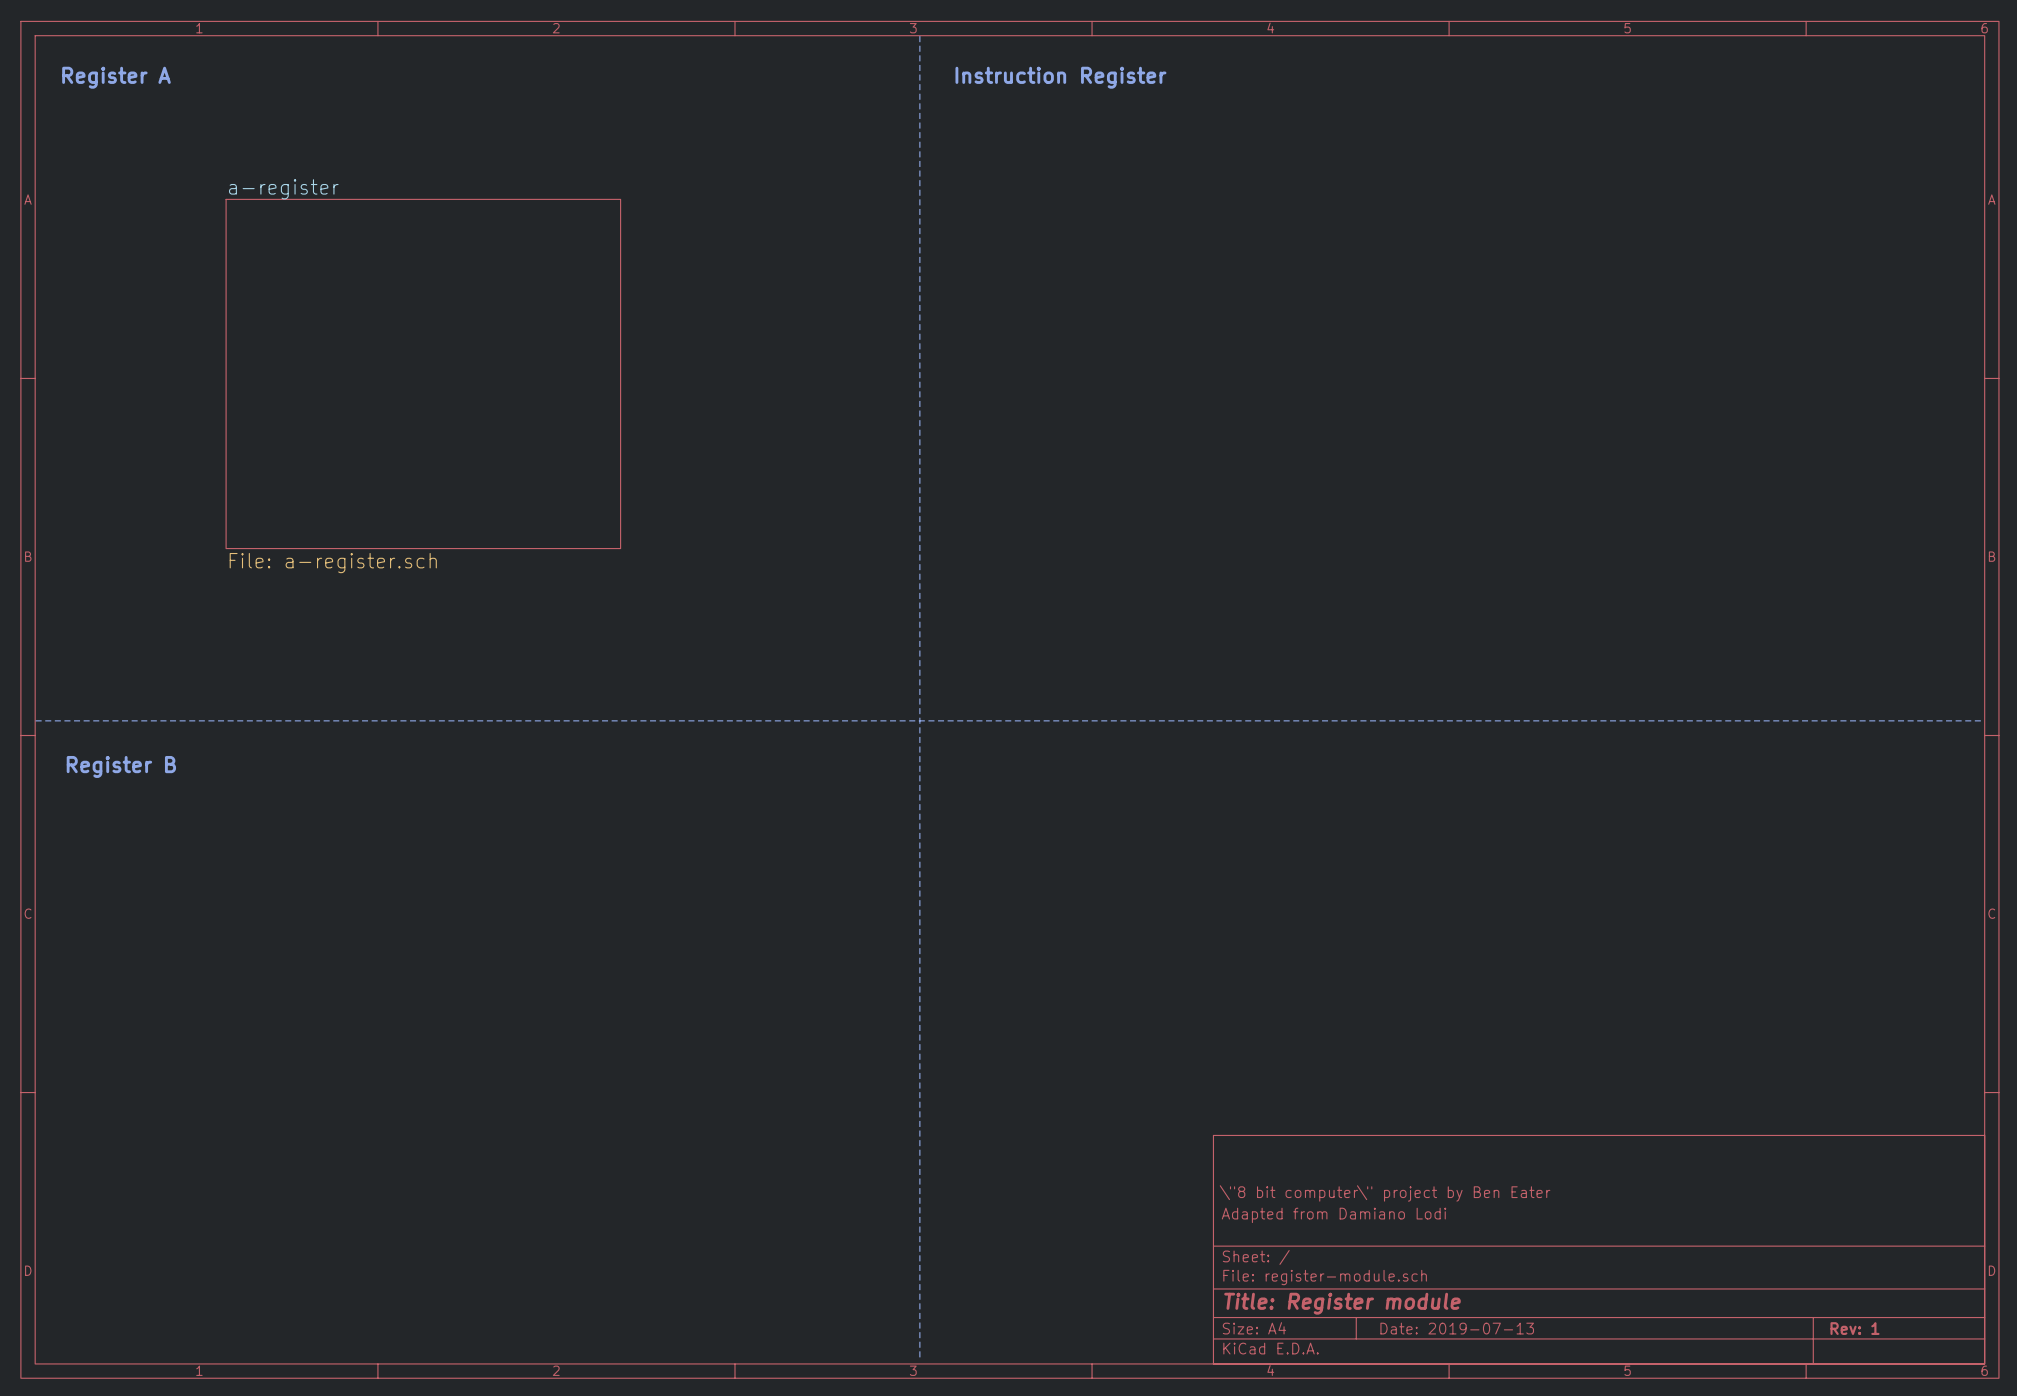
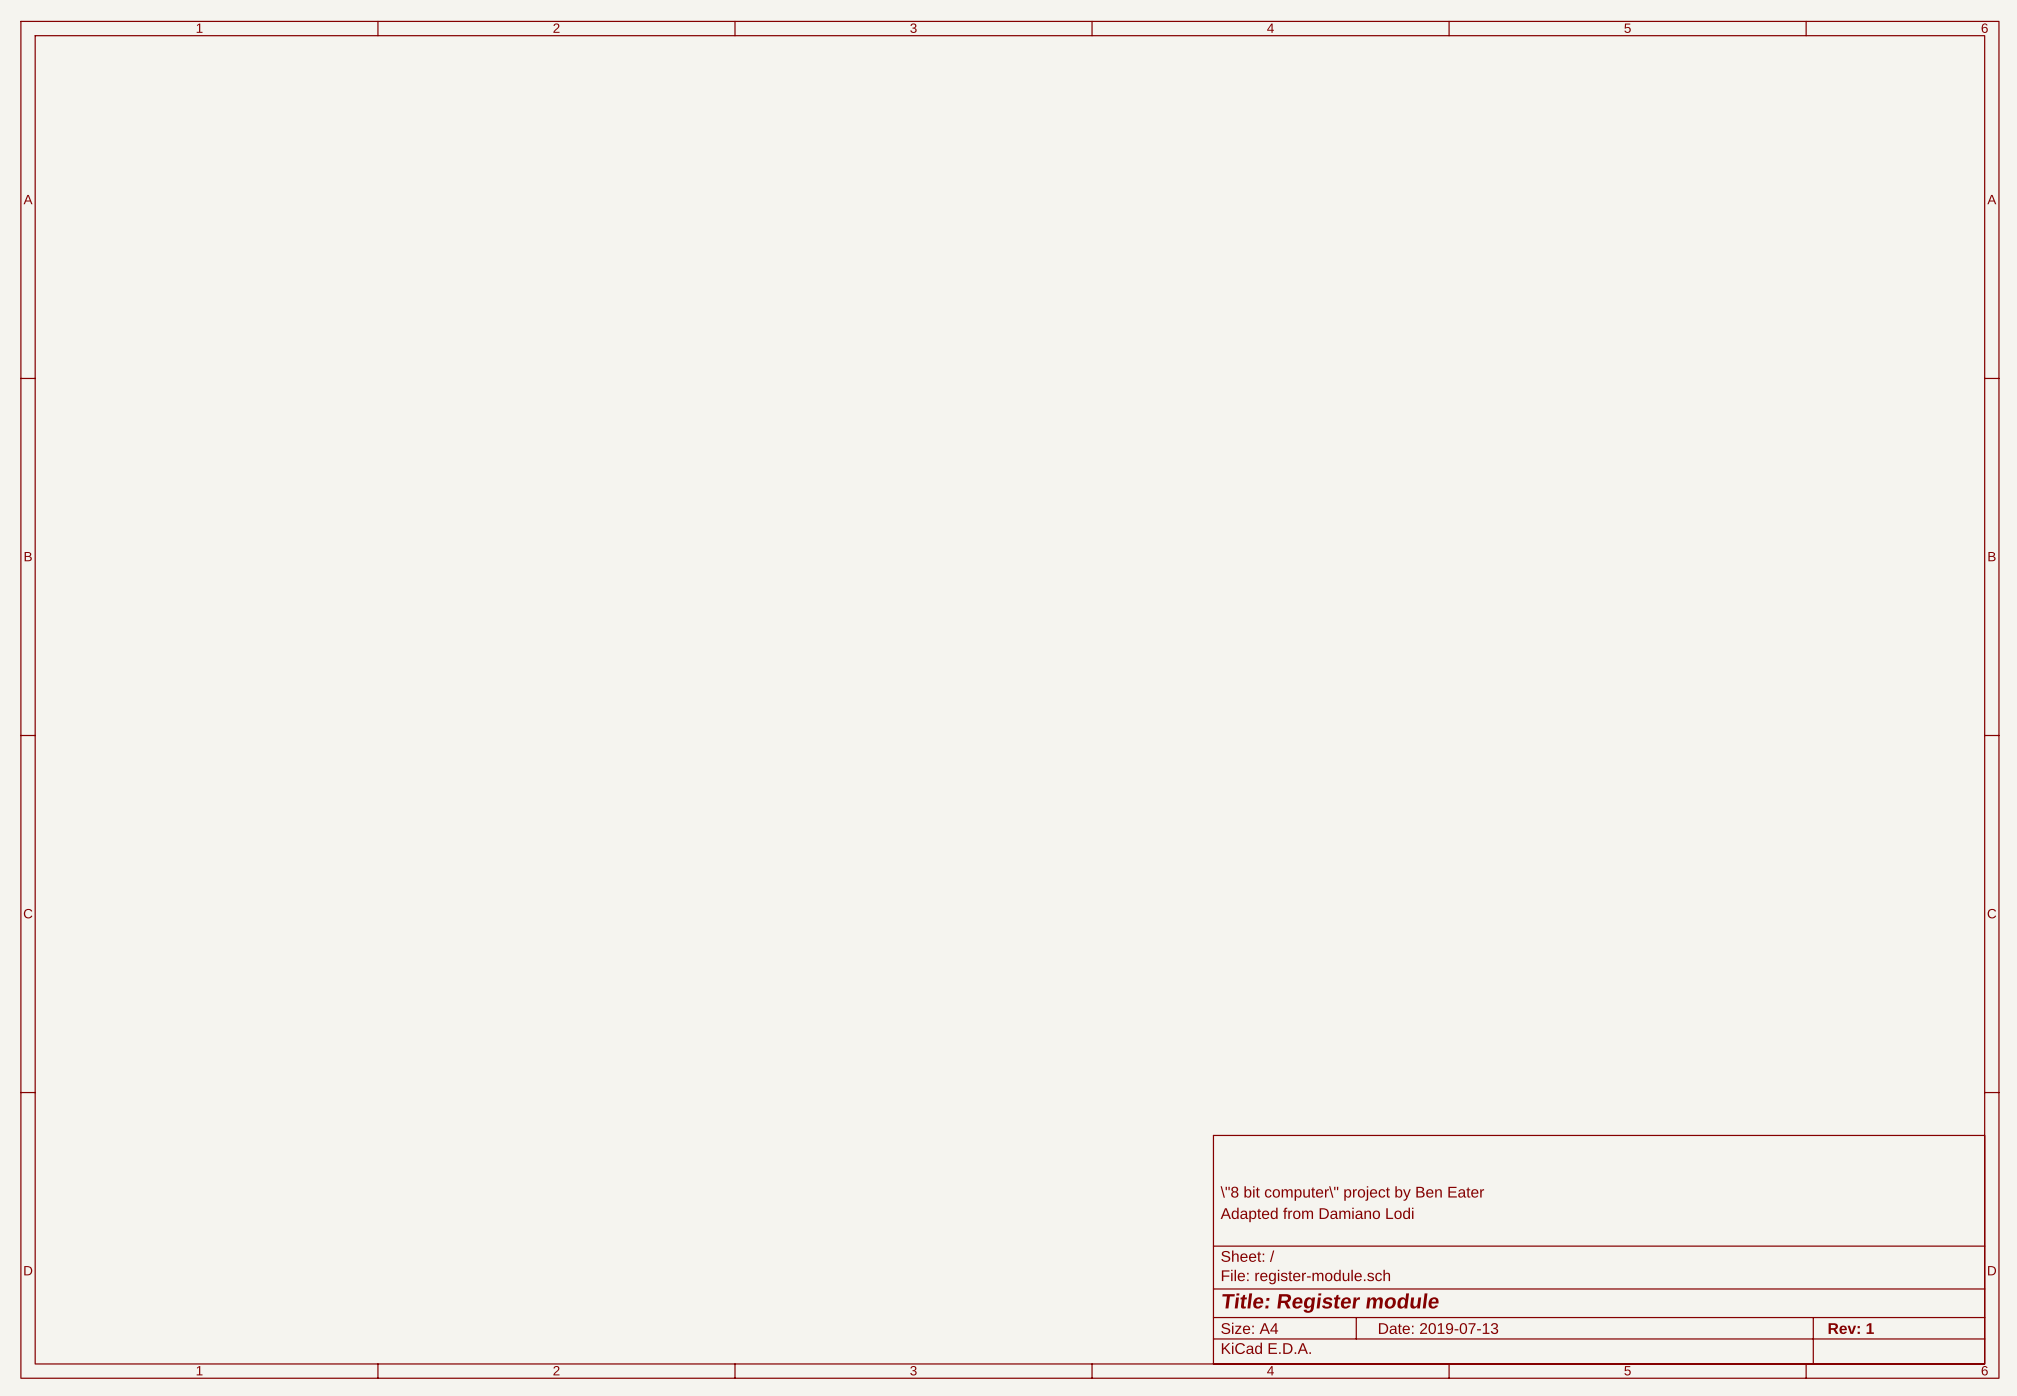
line: (919, 36) (919, 1360) -> none
text: Register A (116, 77) -> none
text: Instruction Register (1060, 77) -> none
sheet a-register: File: a-register.sch (423, 373) -> none
line: (35, 720) (1980, 720) -> none
text: Register B (121, 766) -> none

